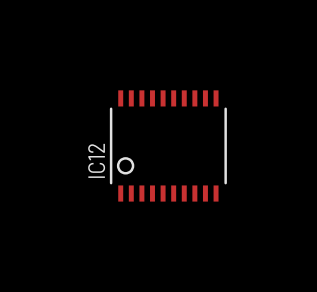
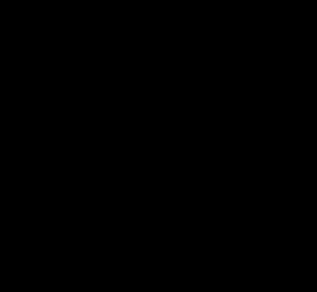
IC12: (168, 145) -> none

